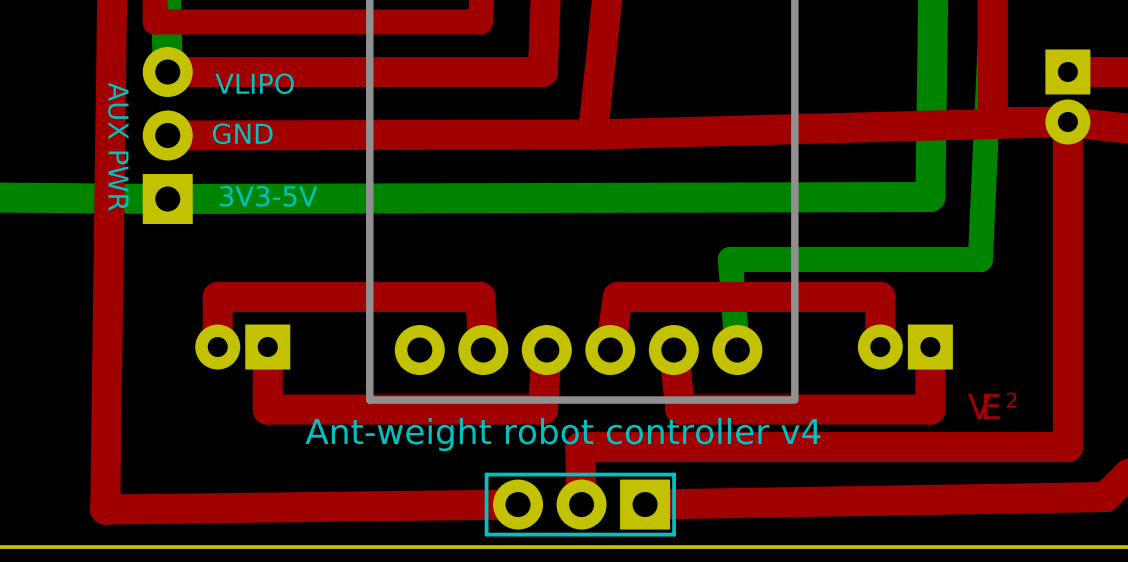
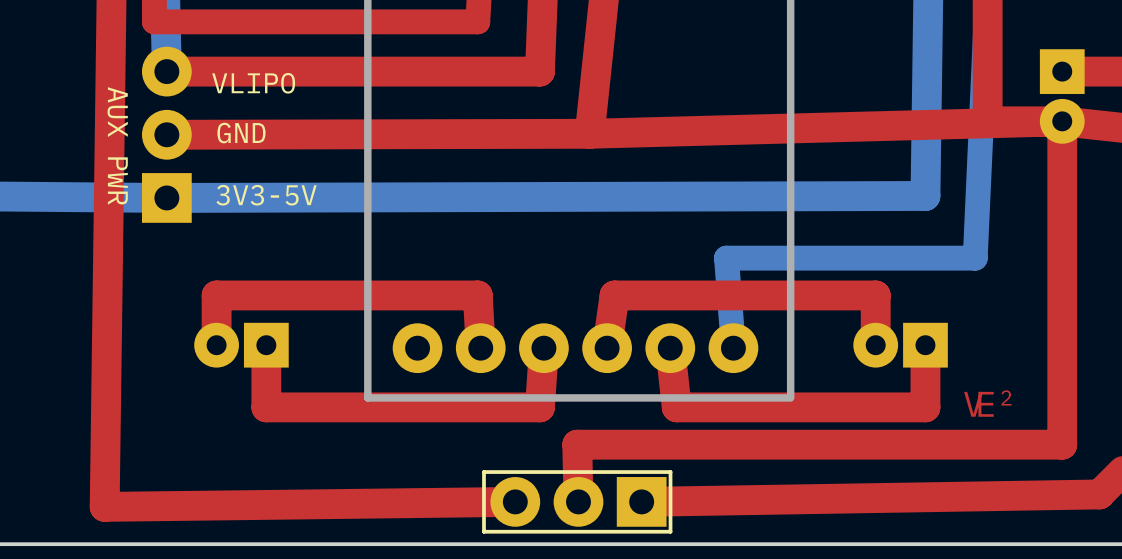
text: Ant-weight robot controller v4 (563, 434) -> none

